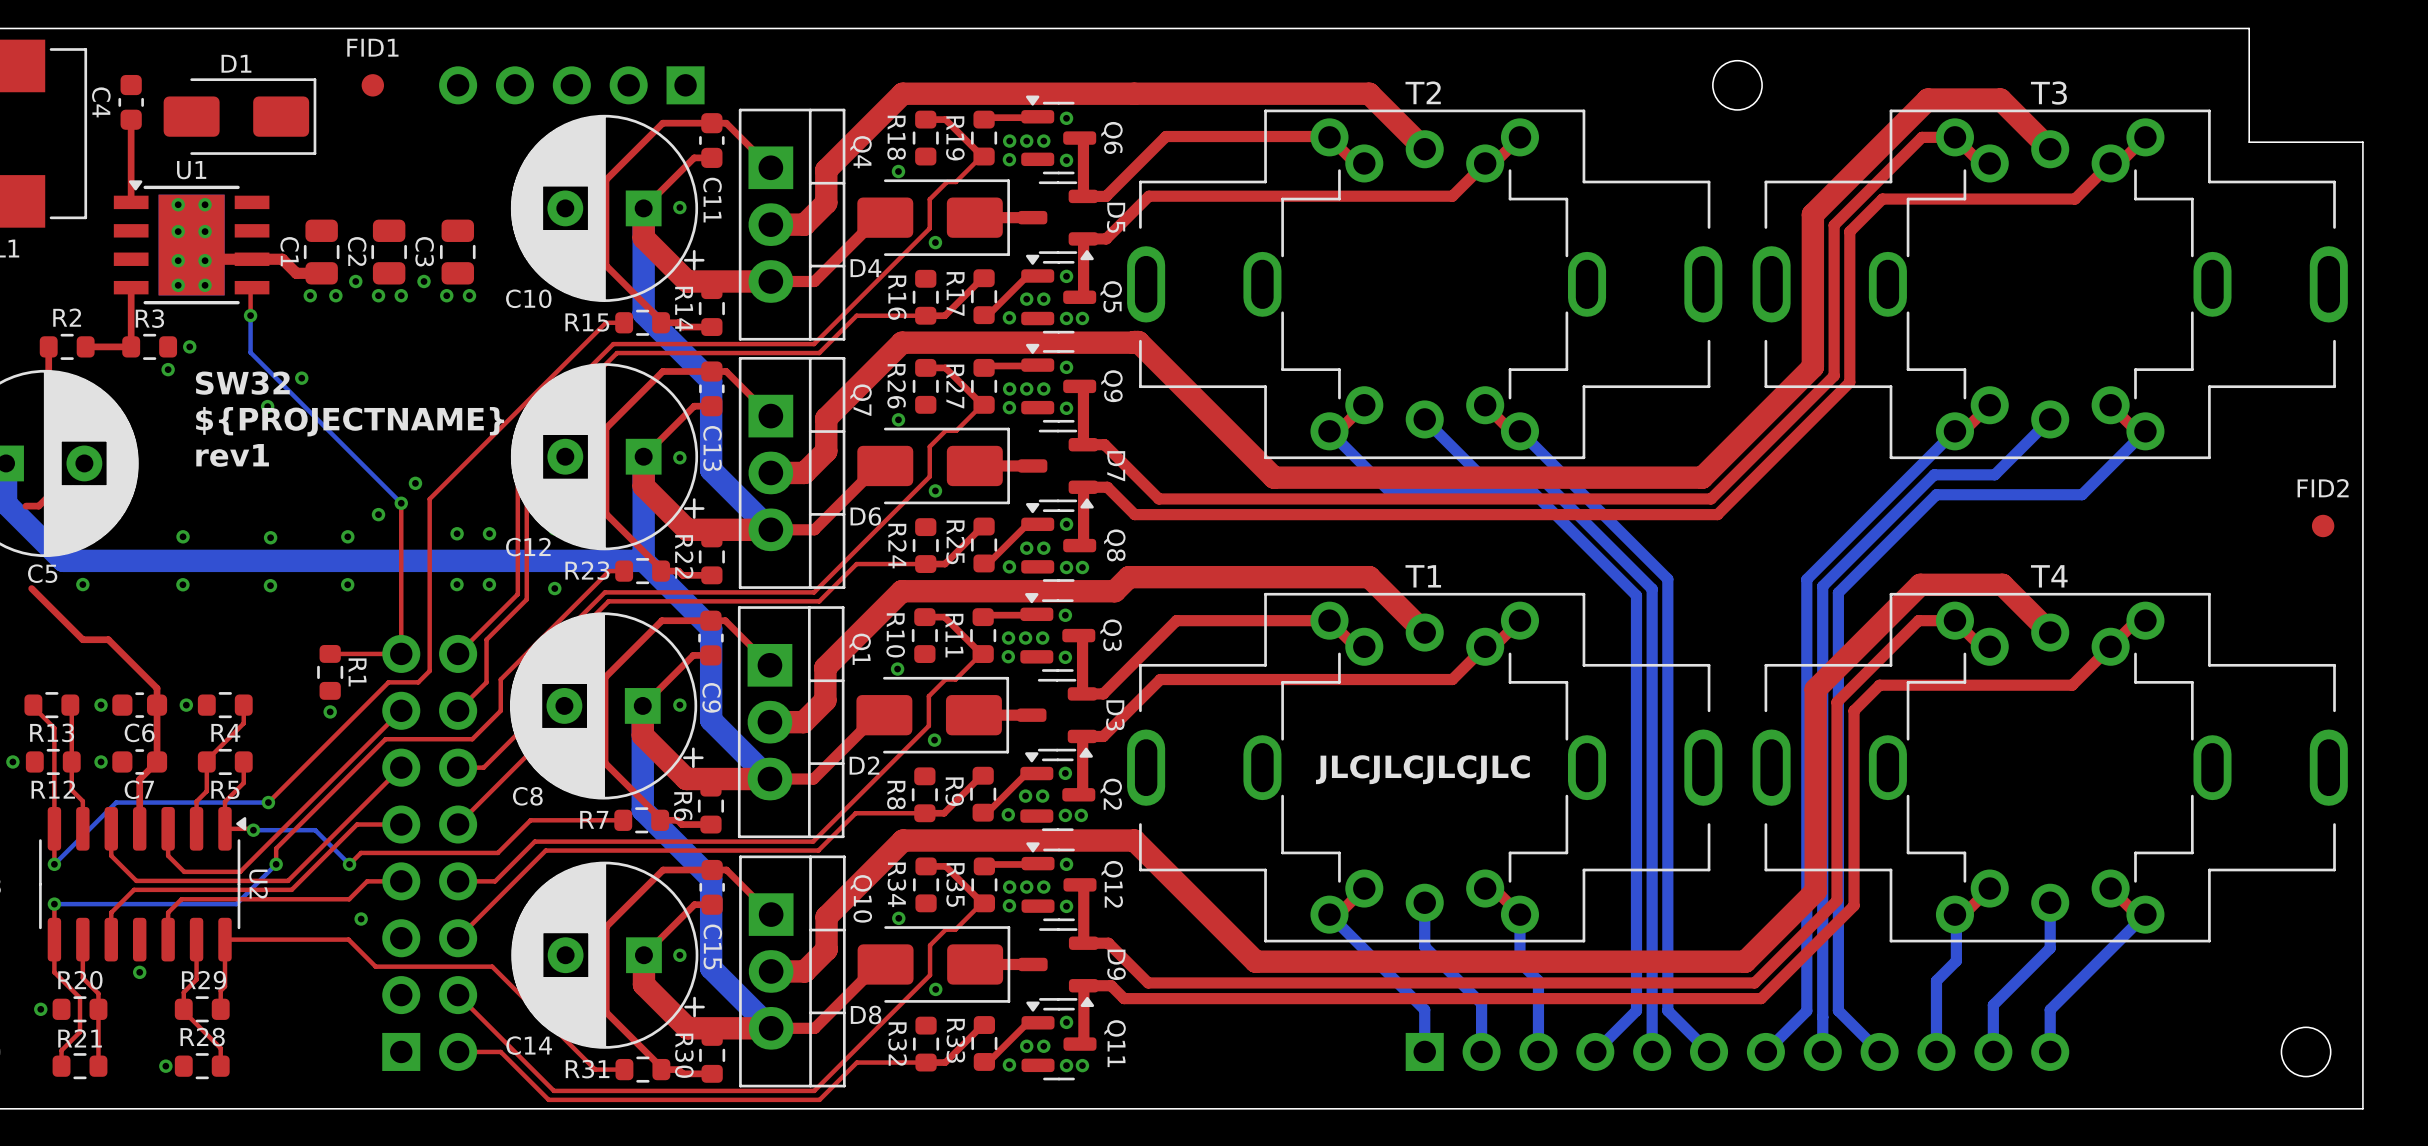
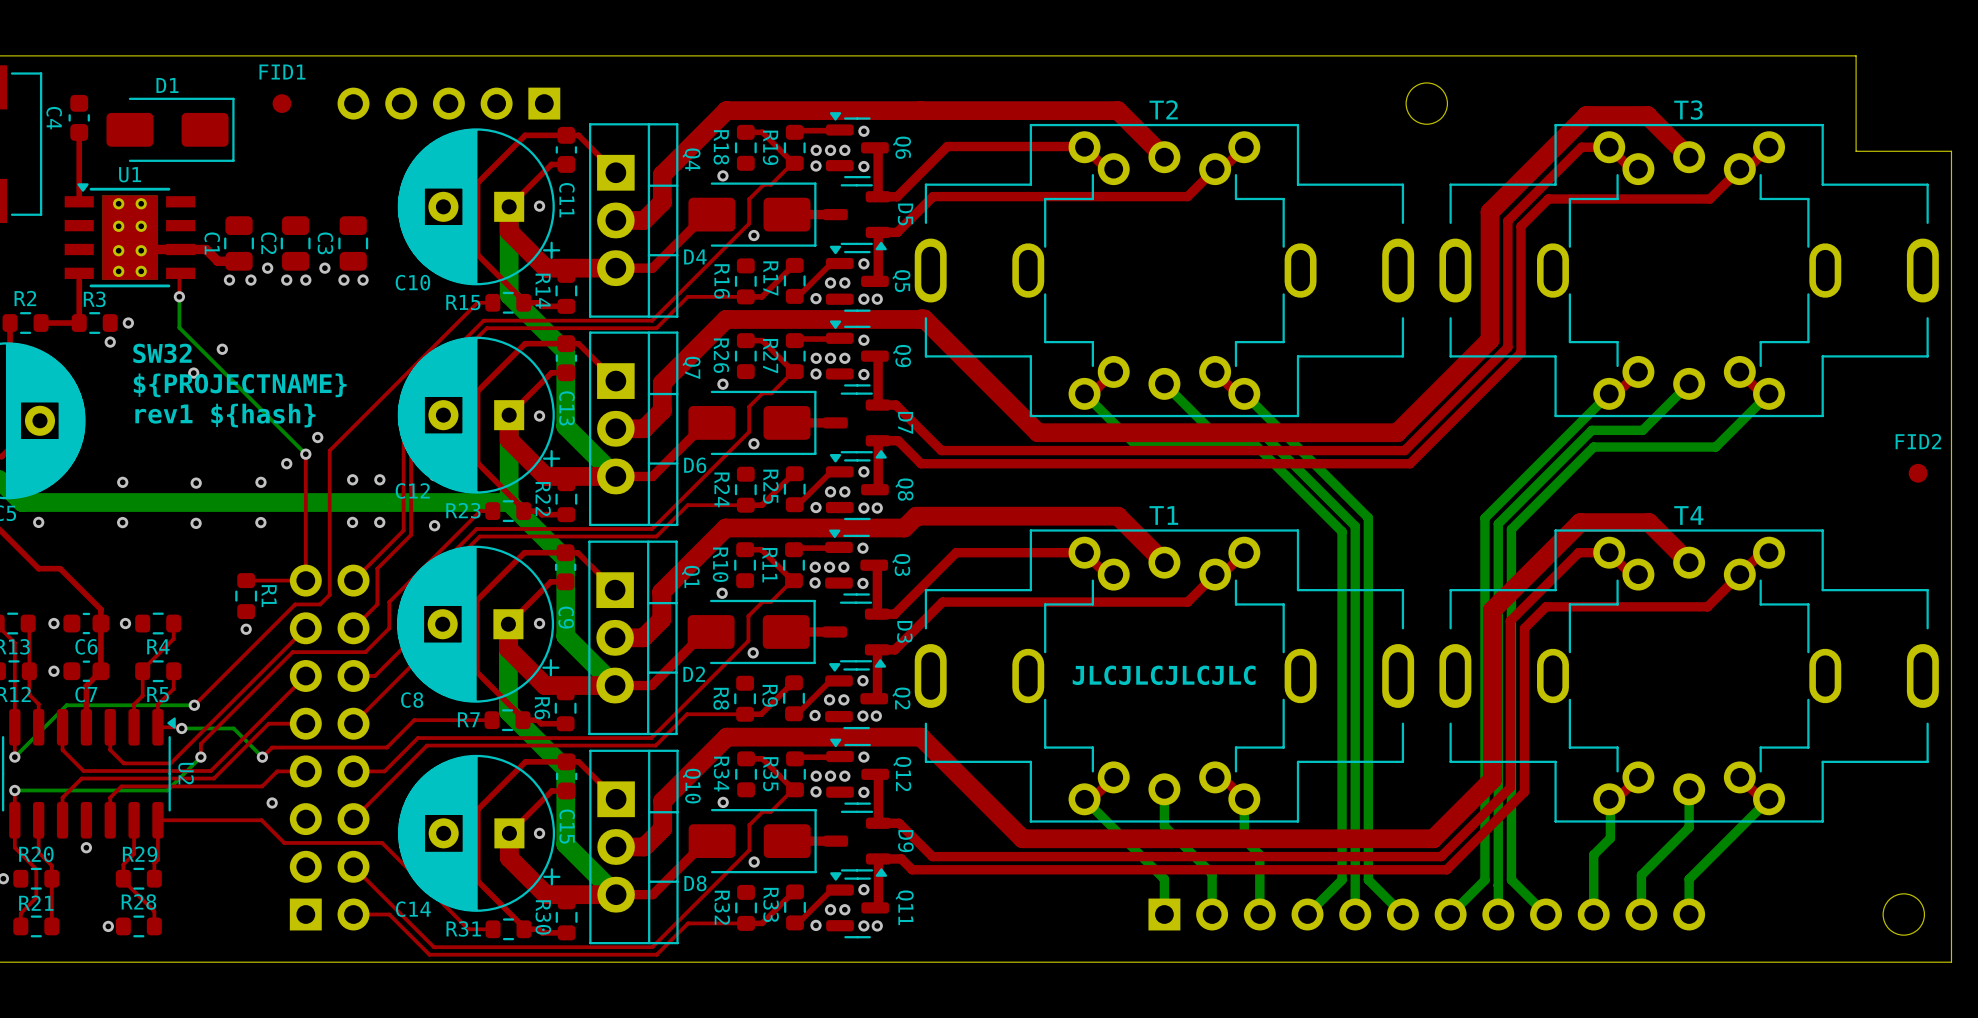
text: rev1 (232, 455) -> rev1 ${hash} (225, 415)

